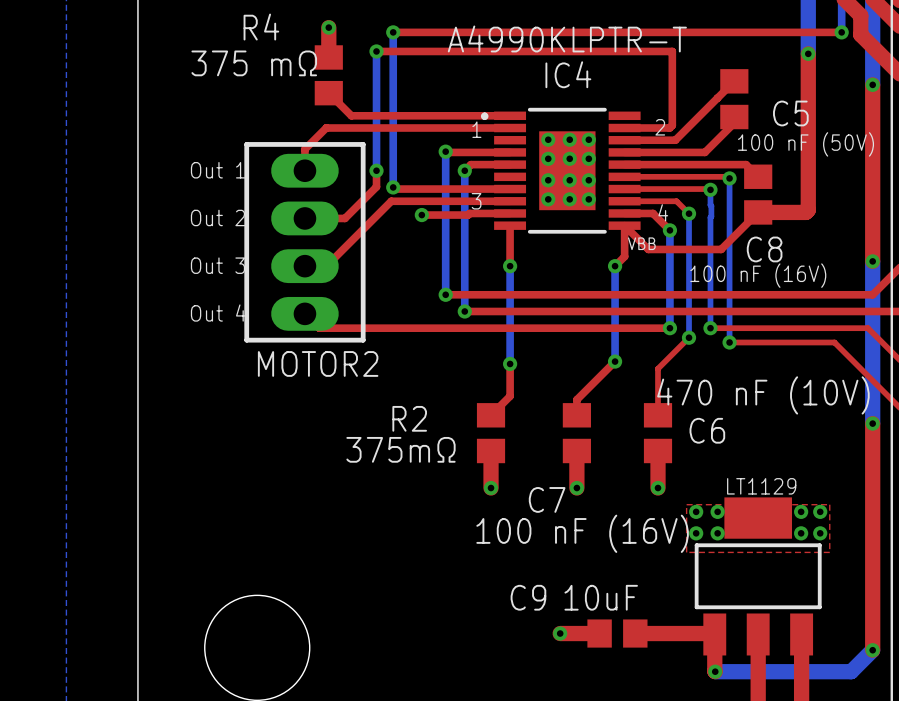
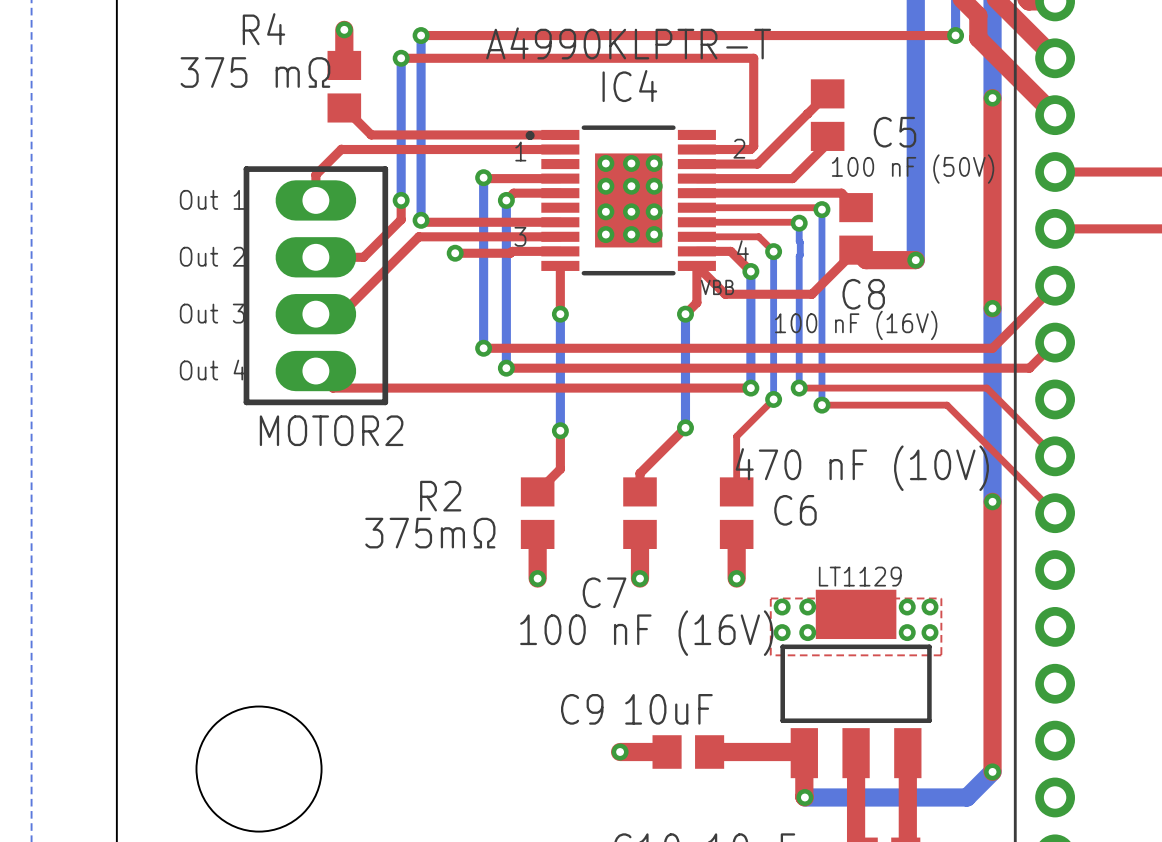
top track: (808, 53) (808, 210) (805, 212) (758, 212) -> (915, 260) (866, 260) (856, 250)
bottom track: none -> (915, 61) (915, 260)
via: (808, 53) -> none
via: none -> (915, 260)

